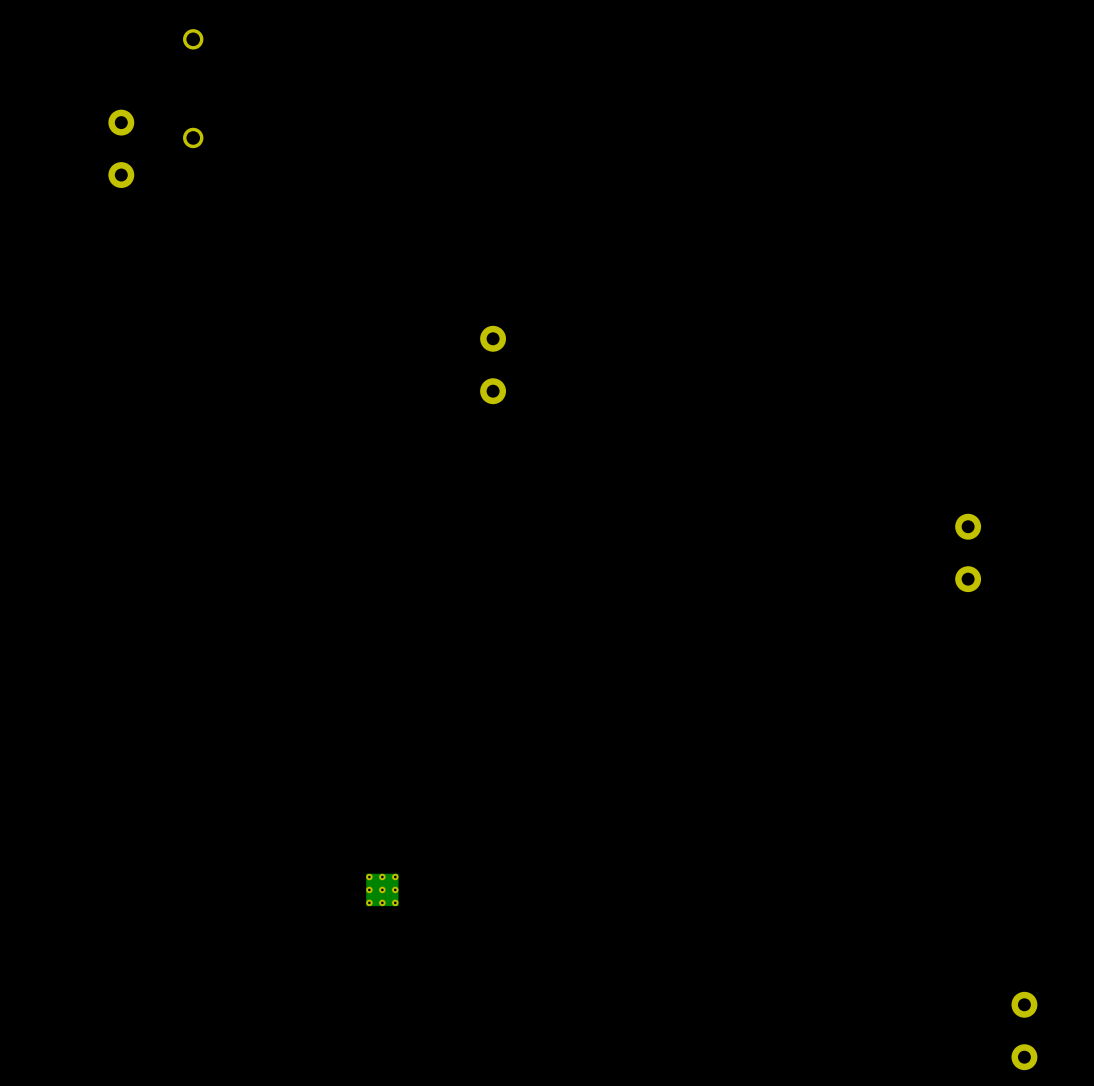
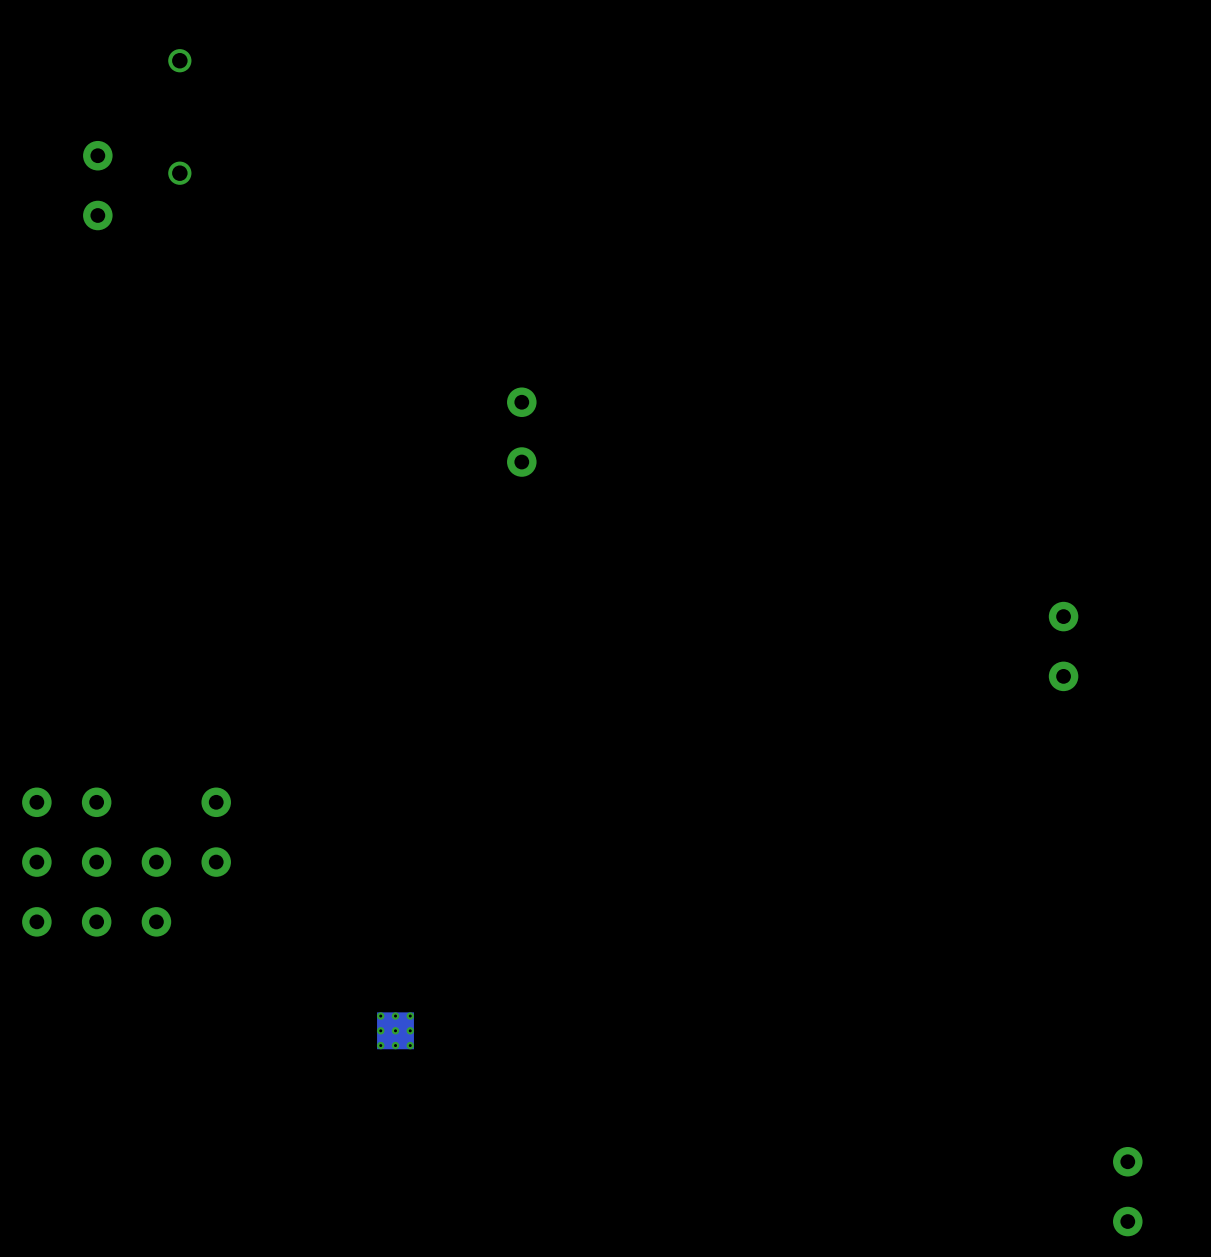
part: none -> (36, 802)
part: none -> (96, 802)
part: none -> (216, 802)
part: none -> (36, 862)
part: none -> (96, 862)
part: none -> (156, 862)
part: none -> (216, 862)
part: none -> (36, 921)
part: none -> (96, 921)
part: none -> (156, 921)

